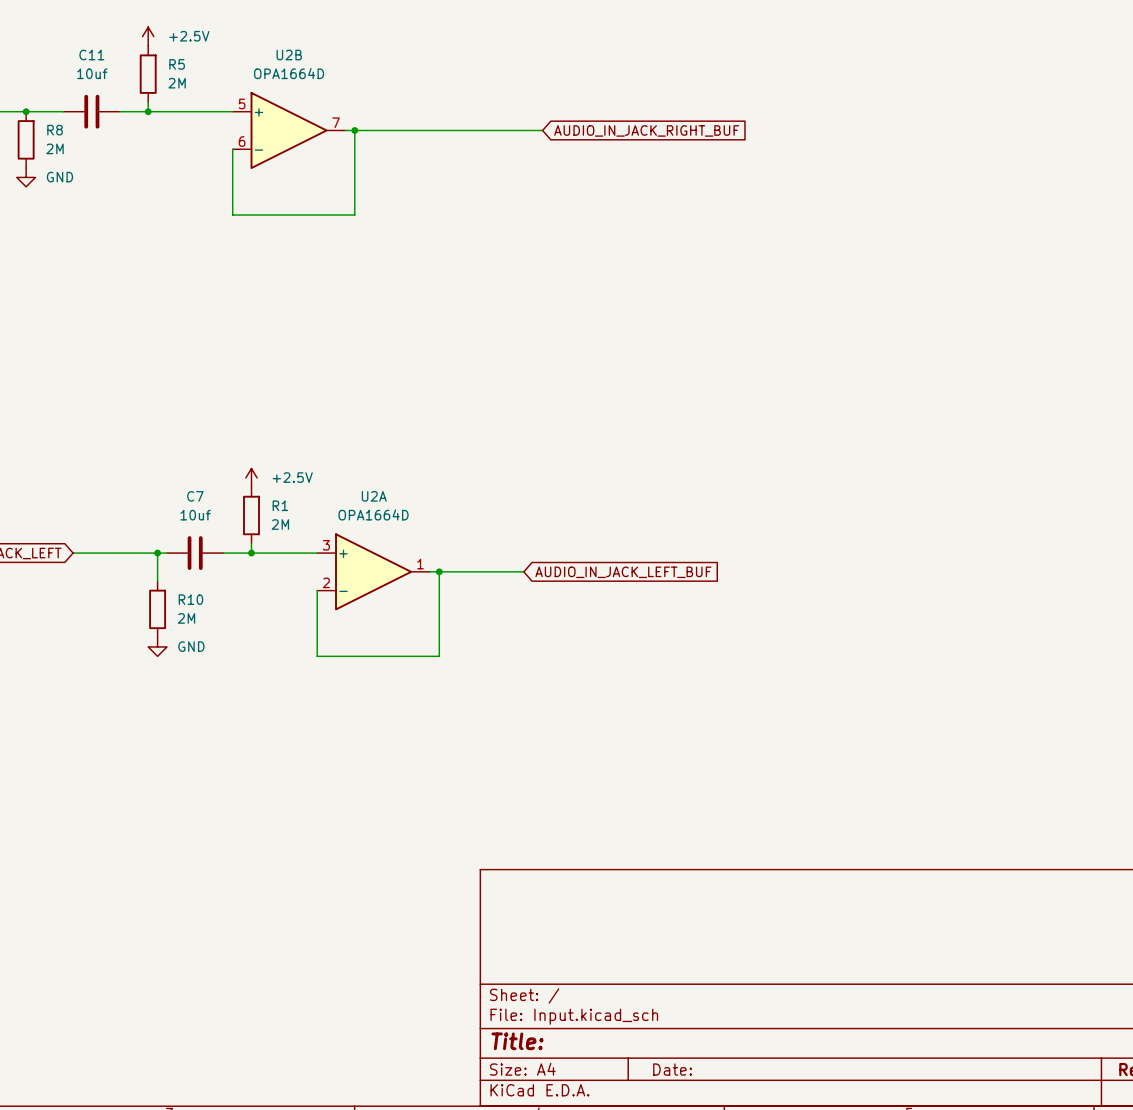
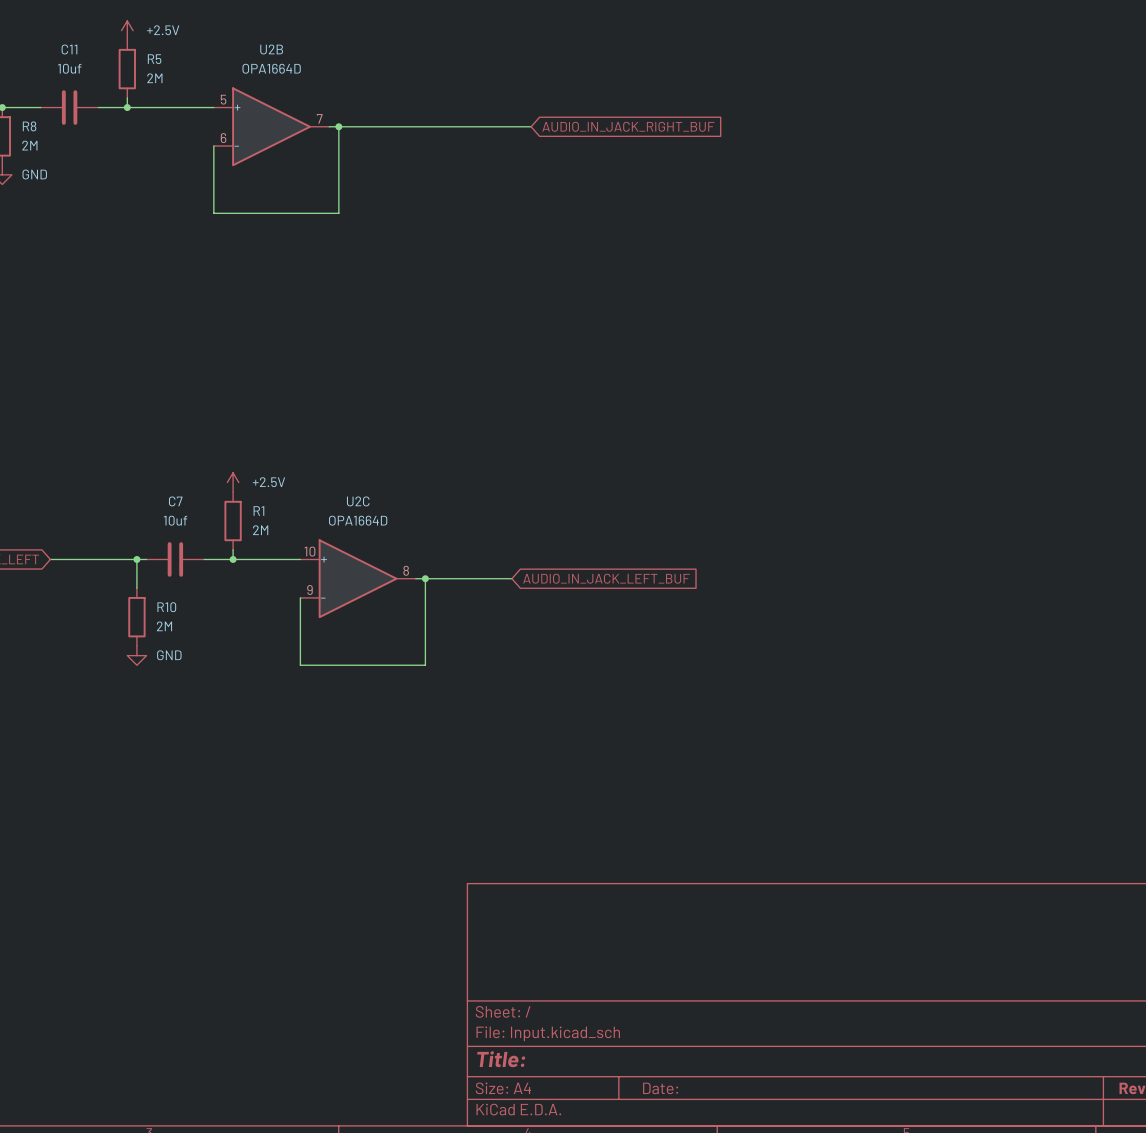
U2A name: U2A (374, 496) -> U2C (358, 501)
U2A pin number: 3 (326, 545) -> 10 (309, 551)
U2A pin number: 1 (420, 564) -> 8 (406, 570)
U2A pin number: 2 (326, 582) -> 9 (309, 590)

